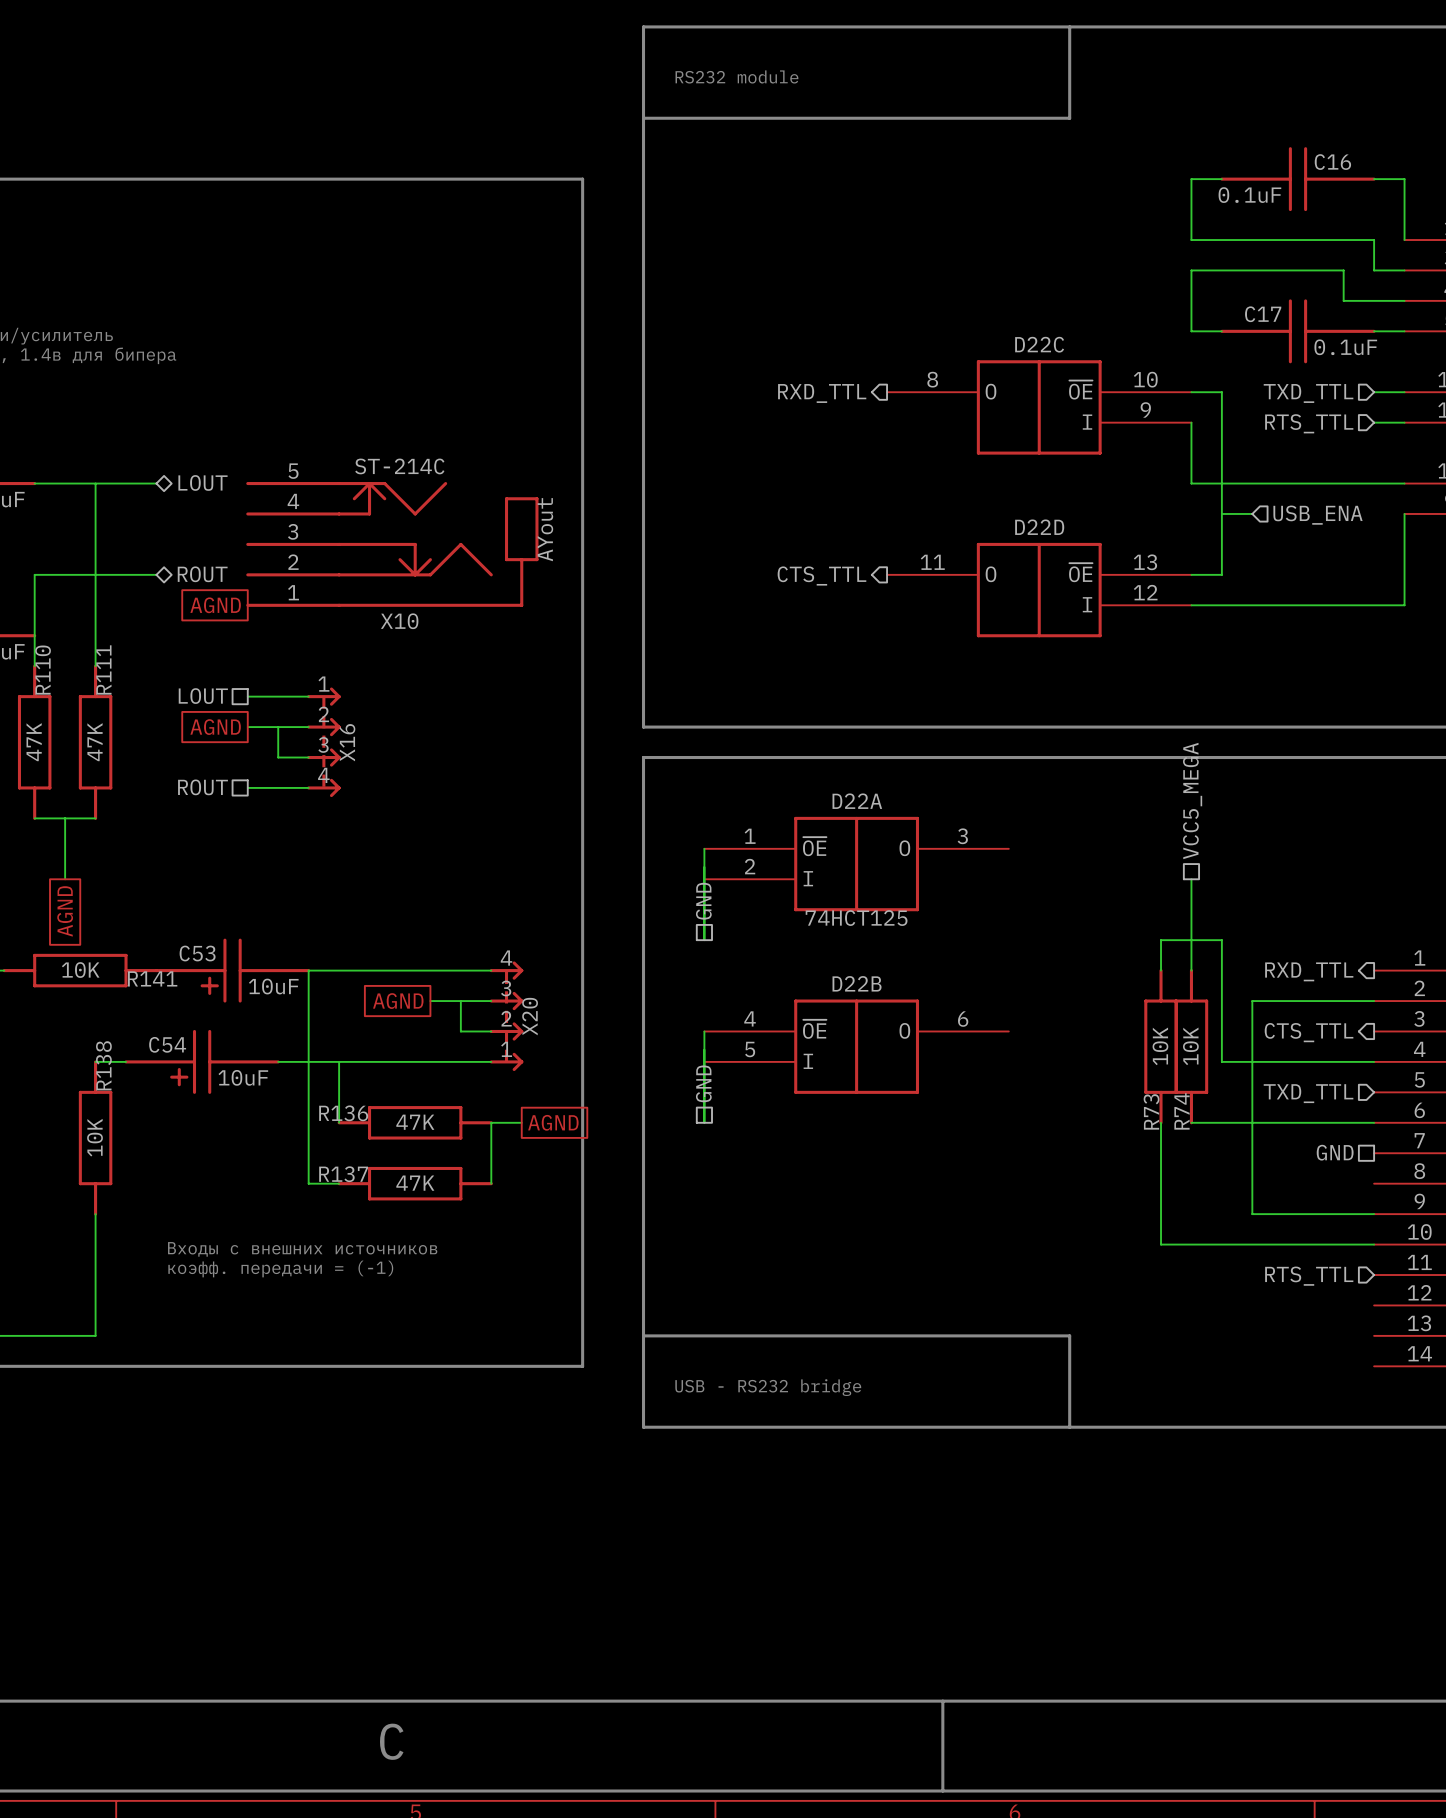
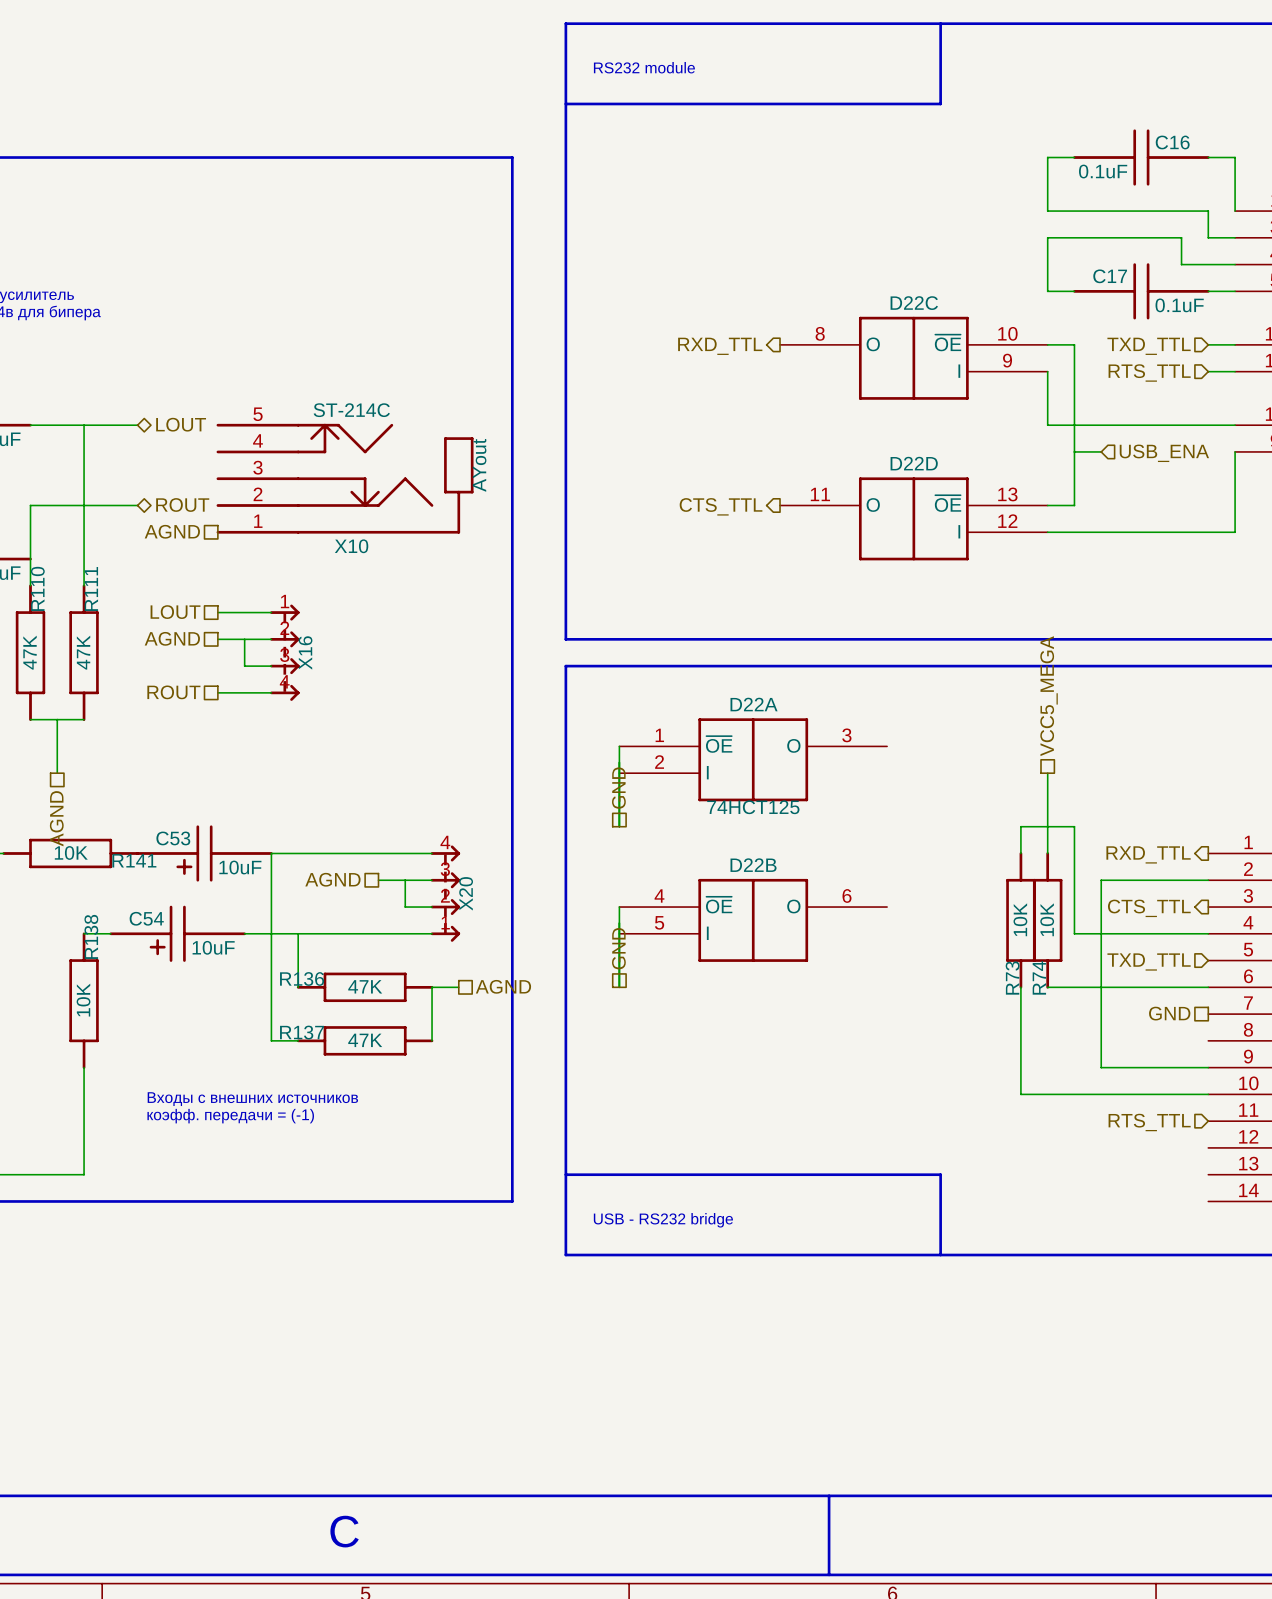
hierarchical label: none -> AGND (172, 531)
global label: AGND (215, 605) -> none
hierarchical label: none -> AGND (172, 638)
global label: AGND (215, 727) -> none
global label: AGND (65, 911) -> none
hierarchical label: none -> AGND (56, 818)
hierarchical label: none -> AGND (332, 879)
global label: AGND (398, 1001) -> none
global label: AGND (553, 1122) -> none
hierarchical label: none -> AGND (503, 986)

